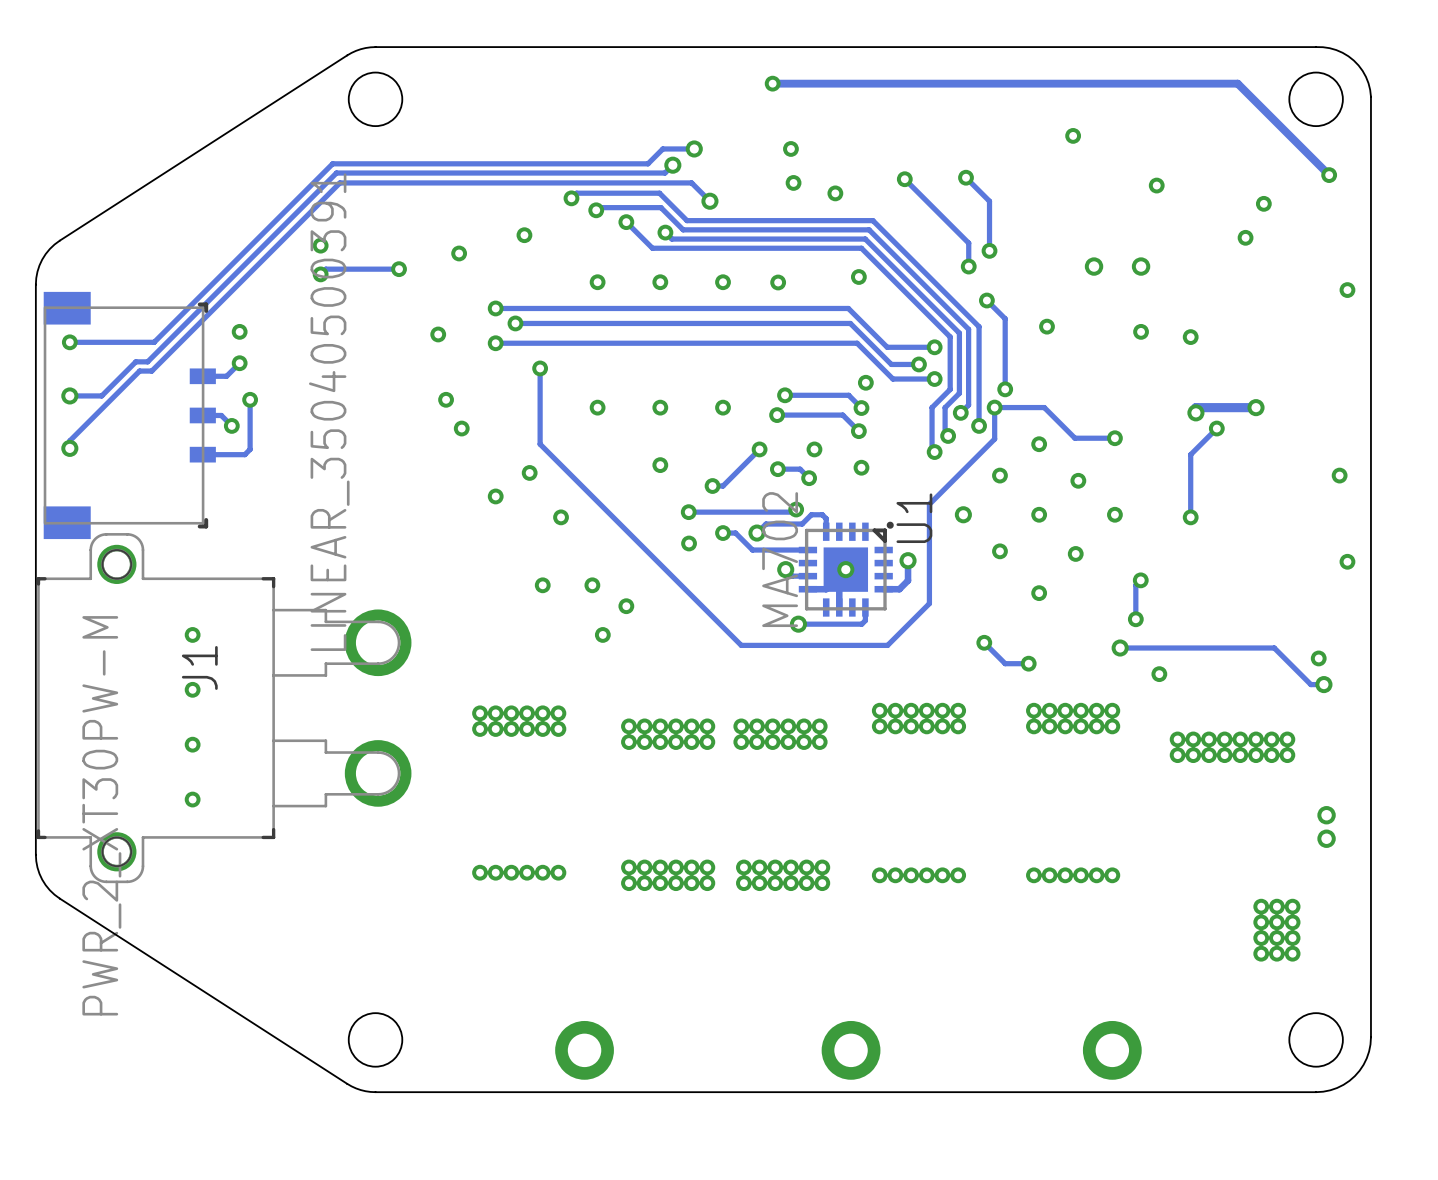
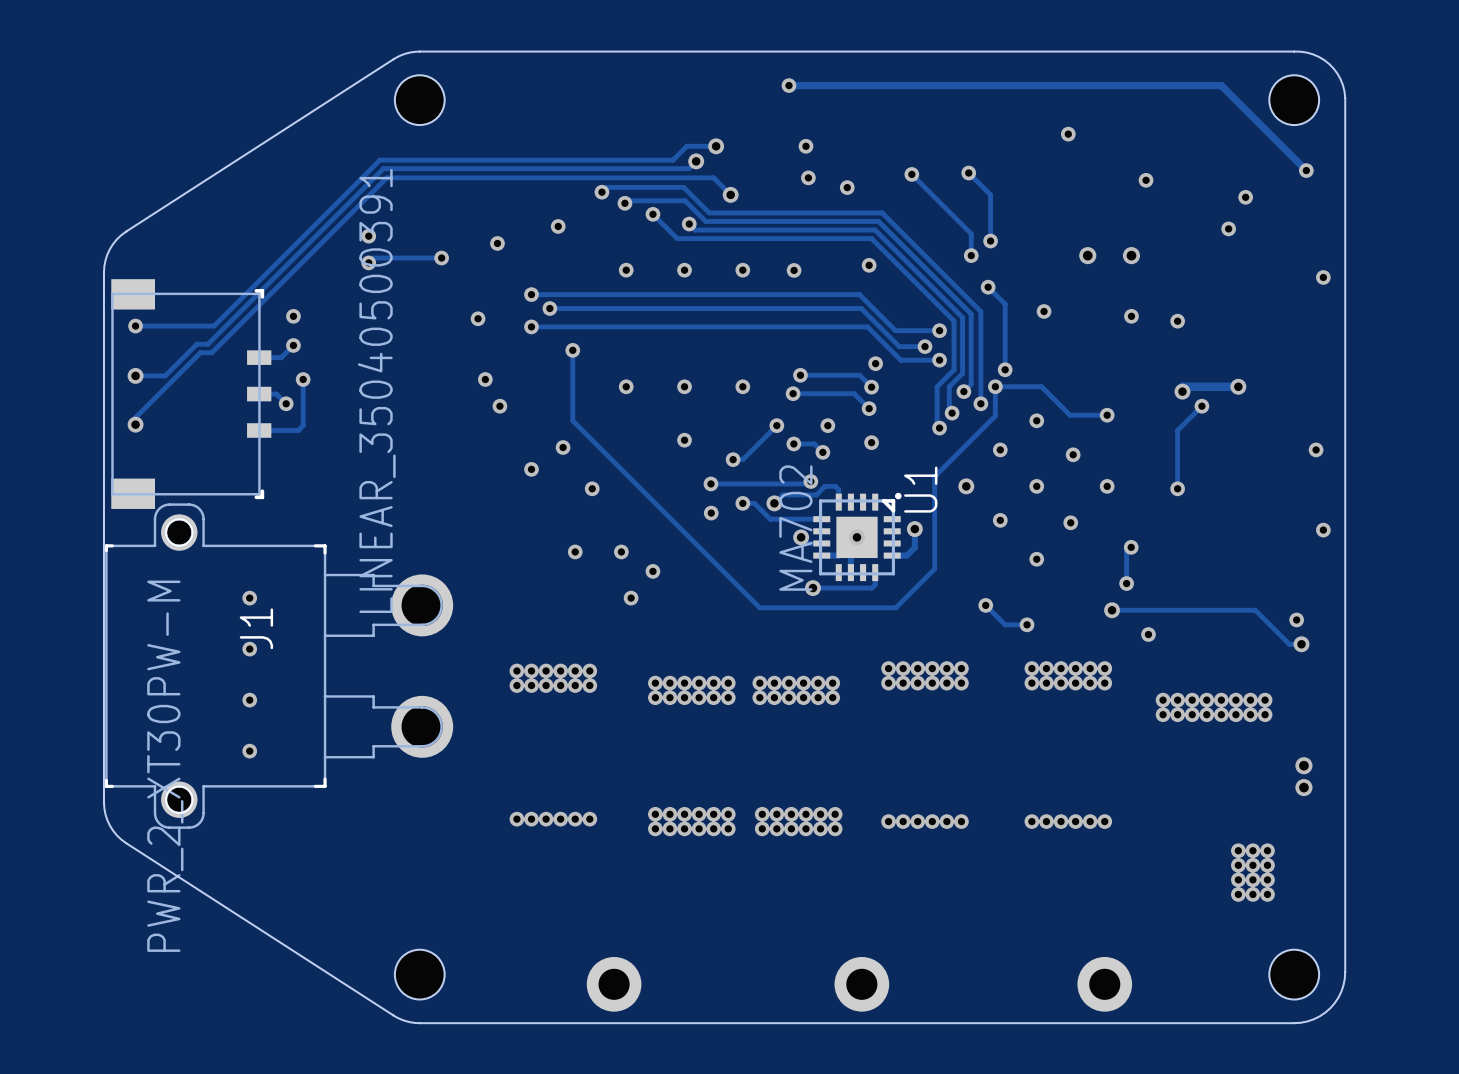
via: (1177, 739) -> none
via: (1193, 739) -> none
via: (1208, 739) -> none
via: (1224, 739) -> none
via: (1240, 739) -> none
via: (1256, 739) -> none
via: (1271, 739) -> none
via: (1287, 739) -> none
via: none -> (1163, 700)
via: none -> (1177, 700)
via: none -> (1192, 700)
via: none -> (1206, 700)
via: none -> (1221, 700)
via: none -> (1235, 700)
via: none -> (1250, 700)
via: none -> (1265, 700)
via: (1177, 755) -> none
via: (1193, 755) -> none
via: (1208, 755) -> none
via: (1224, 755) -> none
via: (1240, 755) -> none
via: (1256, 755) -> none
via: (1271, 755) -> none
via: (1287, 755) -> none
via: none -> (1163, 714)
via: none -> (1177, 714)
via: none -> (1192, 714)
via: none -> (1206, 714)
via: none -> (1221, 714)
via: none -> (1235, 714)
via: none -> (1250, 714)
via: none -> (1265, 714)
via: none -> (1238, 850)
via: (1261, 906) -> none
via: none -> (1252, 850)
via: (1276, 906) -> none
via: none -> (1267, 850)
via: (1292, 906) -> none
via: none -> (1238, 865)
via: (1261, 922) -> none
via: none -> (1252, 865)
via: (1276, 922) -> none
via: none -> (1267, 865)
via: (1292, 922) -> none
via: none -> (1238, 879)
via: (1261, 938) -> none
via: none -> (1252, 879)
via: (1276, 938) -> none
via: none -> (1267, 879)
via: (1292, 938) -> none
via: none -> (1238, 894)
via: (1261, 953) -> none
via: none -> (1252, 894)
via: (1276, 953) -> none
via: none -> (1267, 894)
via: (1292, 953) -> none

